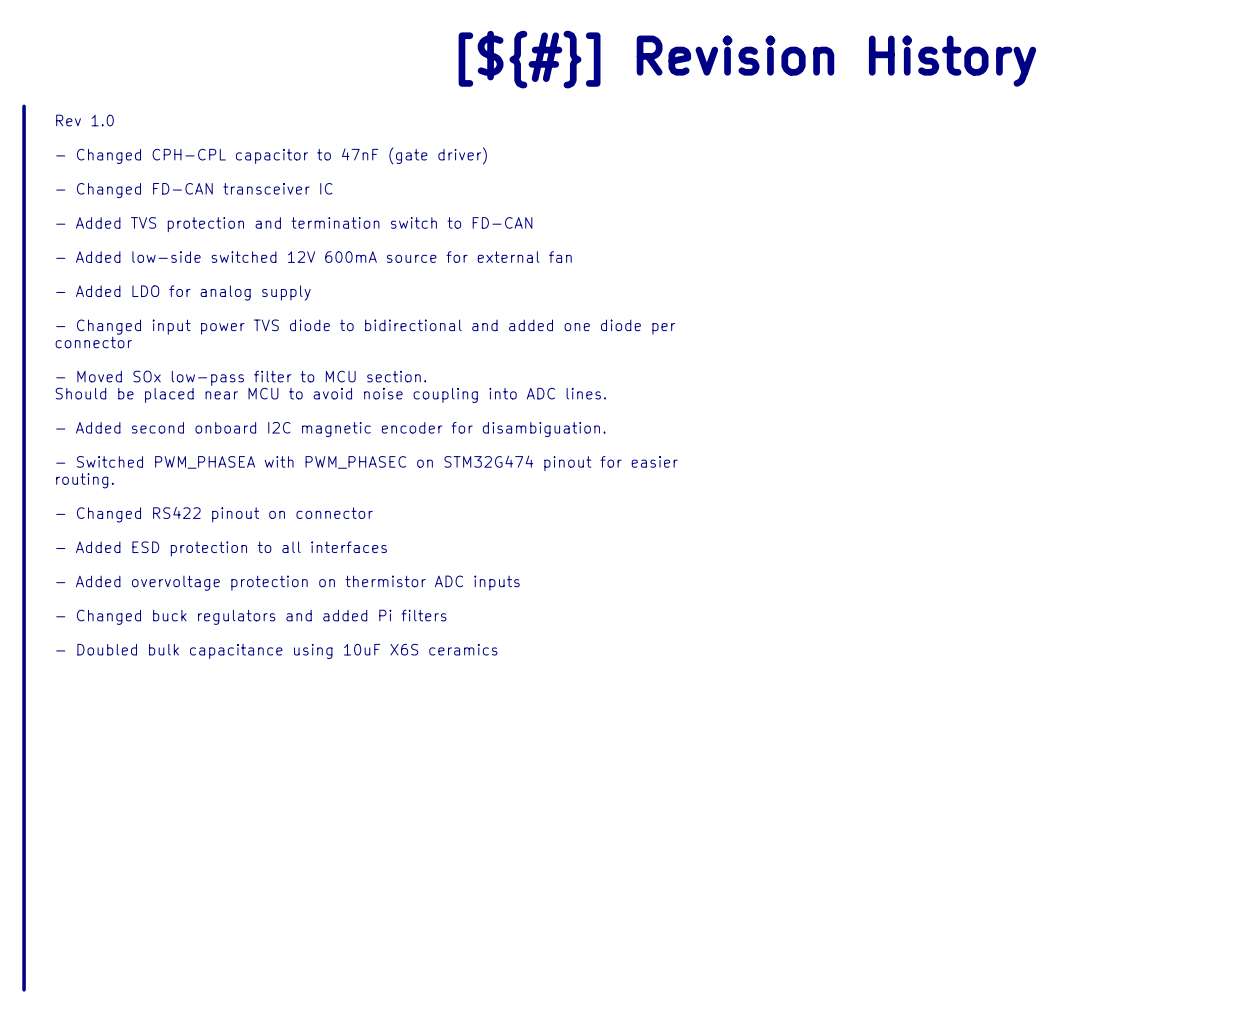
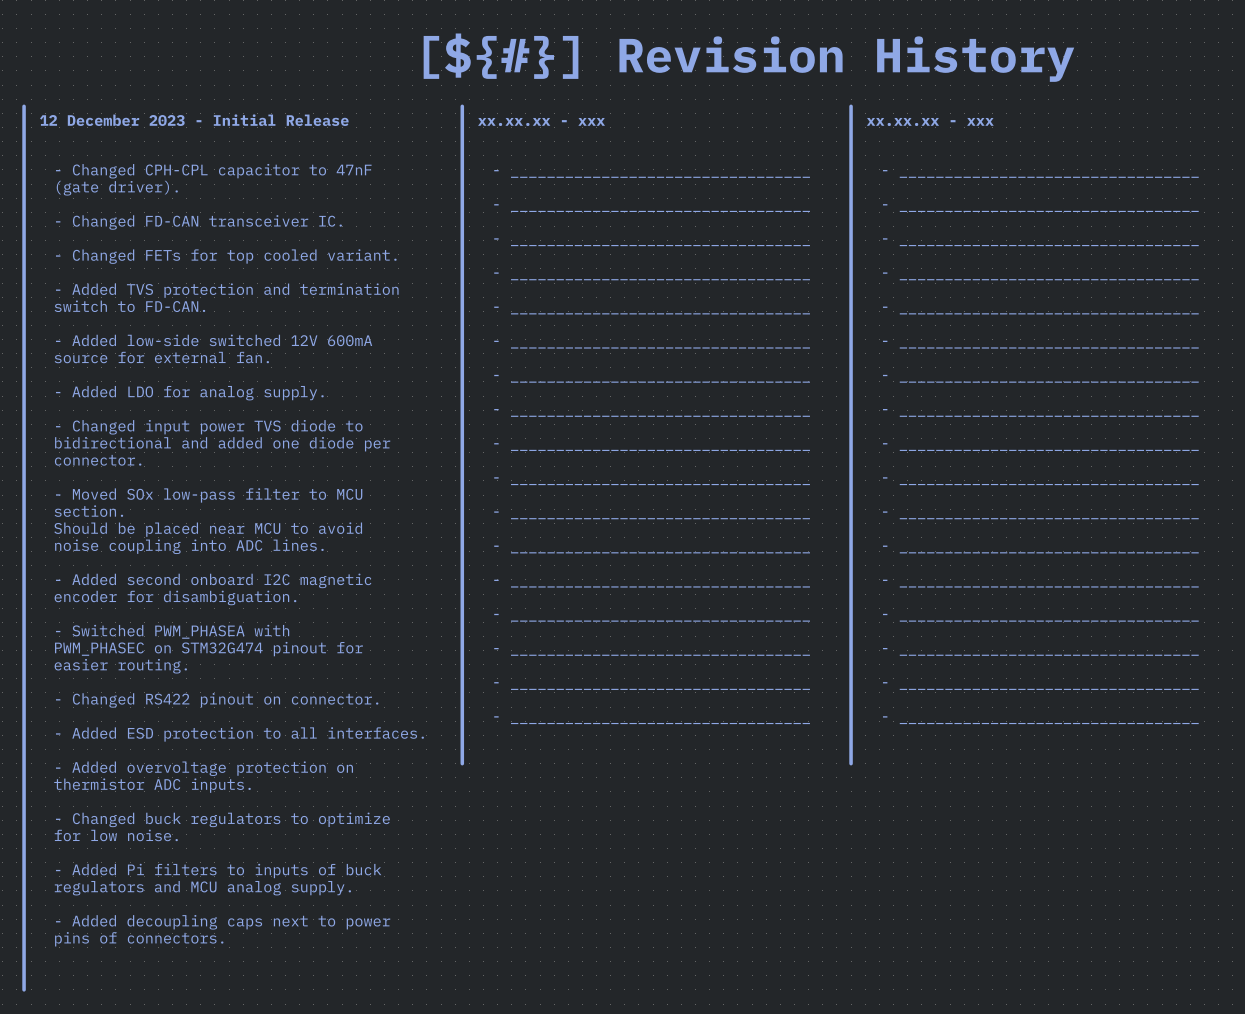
line: none -> (462, 106) (462, 763)
line: none -> (851, 106) (851, 763)
text: Rev 1.0 (84, 120) -> none
text: none -> 12 December 2023 - Initial Release (194, 120)
text: none -> xx.xx.xx - xxx (541, 121)
text: none -> xx.xx.xx - xxx (930, 121)
text: - Changed CPH-CPL capacitor to 47nF (gate driver) (271, 155) -> - Changed CPH-CPL capacitor to 47nF (213, 171)
text: none -> - _________________________________ (652, 173)
text: none -> - _________________________________ (1040, 173)
text: - Changed FD-CAN transceiver IC (194, 190) -> (gate driver). (117, 188)
text: none -> - _________________________________ (652, 208)
text: none -> - _________________________________ (1040, 208)
text: - Added TVS protection and termination switch to FD-CAN (294, 224) -> - Changed FD-CAN transceiver IC. (198, 222)
text: none -> - _________________________________ (652, 242)
text: none -> - _________________________________ (1040, 242)
text: - Added low-side switched 12V 600mA source for external fan (313, 257) -> - Changed FETs for top cooled variant. (226, 256)
text: none -> - _________________________________ (652, 276)
text: none -> - _________________________________ (1040, 276)
text: - Added LDO for analog supply (183, 292) -> - Added TVS protection and termination (227, 290)
text: none -> switch to FD-CAN. (129, 306)
text: none -> - _________________________________ (652, 310)
text: none -> - _________________________________ (1040, 310)
text: - Changed input power TVS diode to bidirectional and added one diode per (365, 327) -> none
text: connector (93, 342) -> - Added low-side switched 12V 600mA (214, 340)
text: none -> - _________________________________ (652, 344)
text: none -> - _________________________________ (1040, 344)
text: none -> source for external fan. (161, 357)
text: - Moved SOx low-pass filter to MCU section. (241, 378) -> none
text: none -> - _________________________________ (652, 378)
text: none -> - _________________________________ (1040, 378)
text: Should be placed near MCU to avoid noise coupling into ADC lines. (330, 395) -> - Added LDO for analog supply. (189, 393)
text: none -> - _________________________________ (652, 412)
text: none -> - _________________________________ (1040, 412)
text: - Added second onboard I2C magnetic encoder for disambiguation. (330, 429) -> - Changed input power TVS diode to (209, 427)
text: none -> bidirectional and added one diode per (222, 444)
text: none -> - _________________________________ (652, 447)
text: none -> - _________________________________ (1040, 447)
text: - Switched PWM_PHASEA with PWM_PHASEC on STM32G474 pinout for easier (366, 463) -> connector. (98, 460)
text: routing. (84, 480) -> none
text: none -> - _________________________________ (652, 481)
text: none -> - _________________________________ (1040, 481)
text: none -> - Moved SOx low-pass filter to MCU (209, 495)
text: - Changed RS422 pinout on connector (214, 514) -> section. (88, 511)
text: none -> - _________________________________ (652, 515)
text: none -> - _________________________________ (1040, 515)
text: none -> Should be placed near MCU to avoid (208, 529)
text: - Added ESD protection to all interfaces (221, 549) -> noise coupling into ADC lines. (189, 546)
text: none -> - _________________________________ (652, 549)
text: none -> - _________________________________ (1040, 549)
text: - Added overvoltage protection on thermistor ADC inputs (287, 583) -> - Added second onboard I2C magnetic (213, 580)
text: none -> - _________________________________ (652, 583)
text: none -> - _________________________________ (1040, 583)
text: none -> encoder for disambiguation. (175, 597)
text: - Changed buck regulators and added Pi filters (251, 617) -> none
text: none -> - _________________________________ (652, 617)
text: none -> - _________________________________ (1040, 617)
text: none -> - Switched PWM_PHASEA with (172, 631)
text: - Doubled bulk capacitance using 10uF X6S ceramics (276, 651) -> PWM_PHASEC on STM32G474 pinout for (208, 649)
text: none -> - _________________________________ (652, 651)
text: none -> - _________________________________ (1040, 651)
text: none -> easier routing. (120, 666)
text: none -> - _________________________________ (652, 686)
text: none -> - _________________________________ (1040, 686)
text: none -> - Changed RS422 pinout on connector. (217, 700)
text: none -> - _________________________________ (652, 720)
text: none -> - _________________________________ (1040, 720)
text: none -> - Added ESD protection to all interfaces. (239, 734)
text: none -> - Added overvoltage protection on (204, 768)
text: none -> thermistor ADC inputs. (152, 785)
text: none -> - Changed buck regulators to optimize (222, 819)
text: none -> for low noise. (116, 835)
text: none -> - Added Pi filters to inputs of buck (218, 870)
text: none -> regulators and MCU analog supply. (202, 888)
text: none -> - Added decoupling caps next to power (223, 922)
text: none -> pins of connectors. (139, 939)

